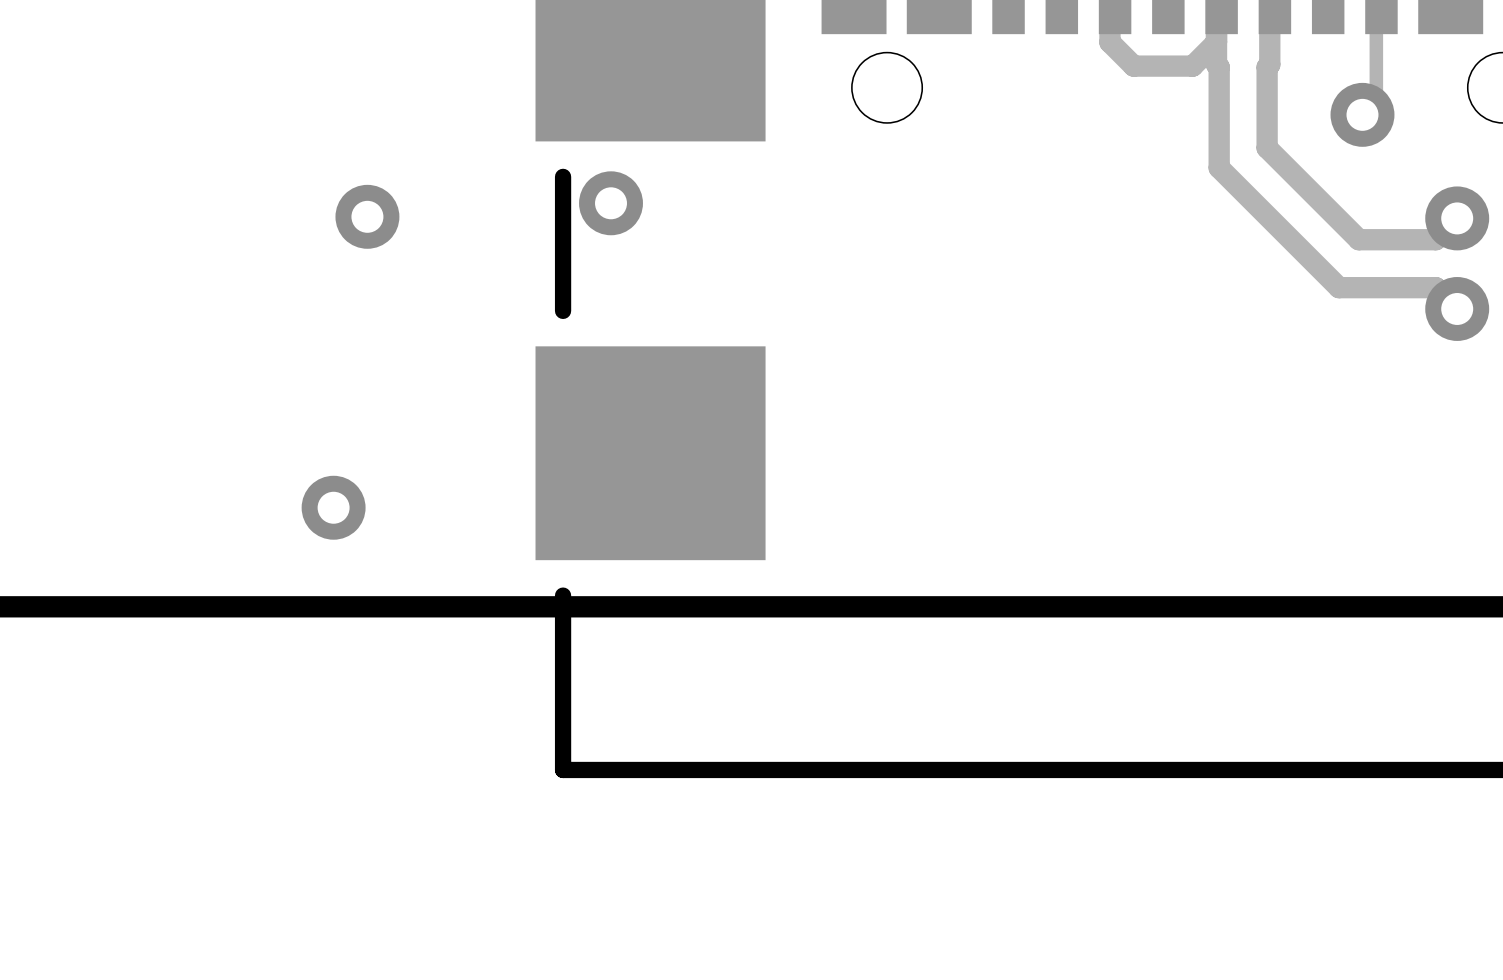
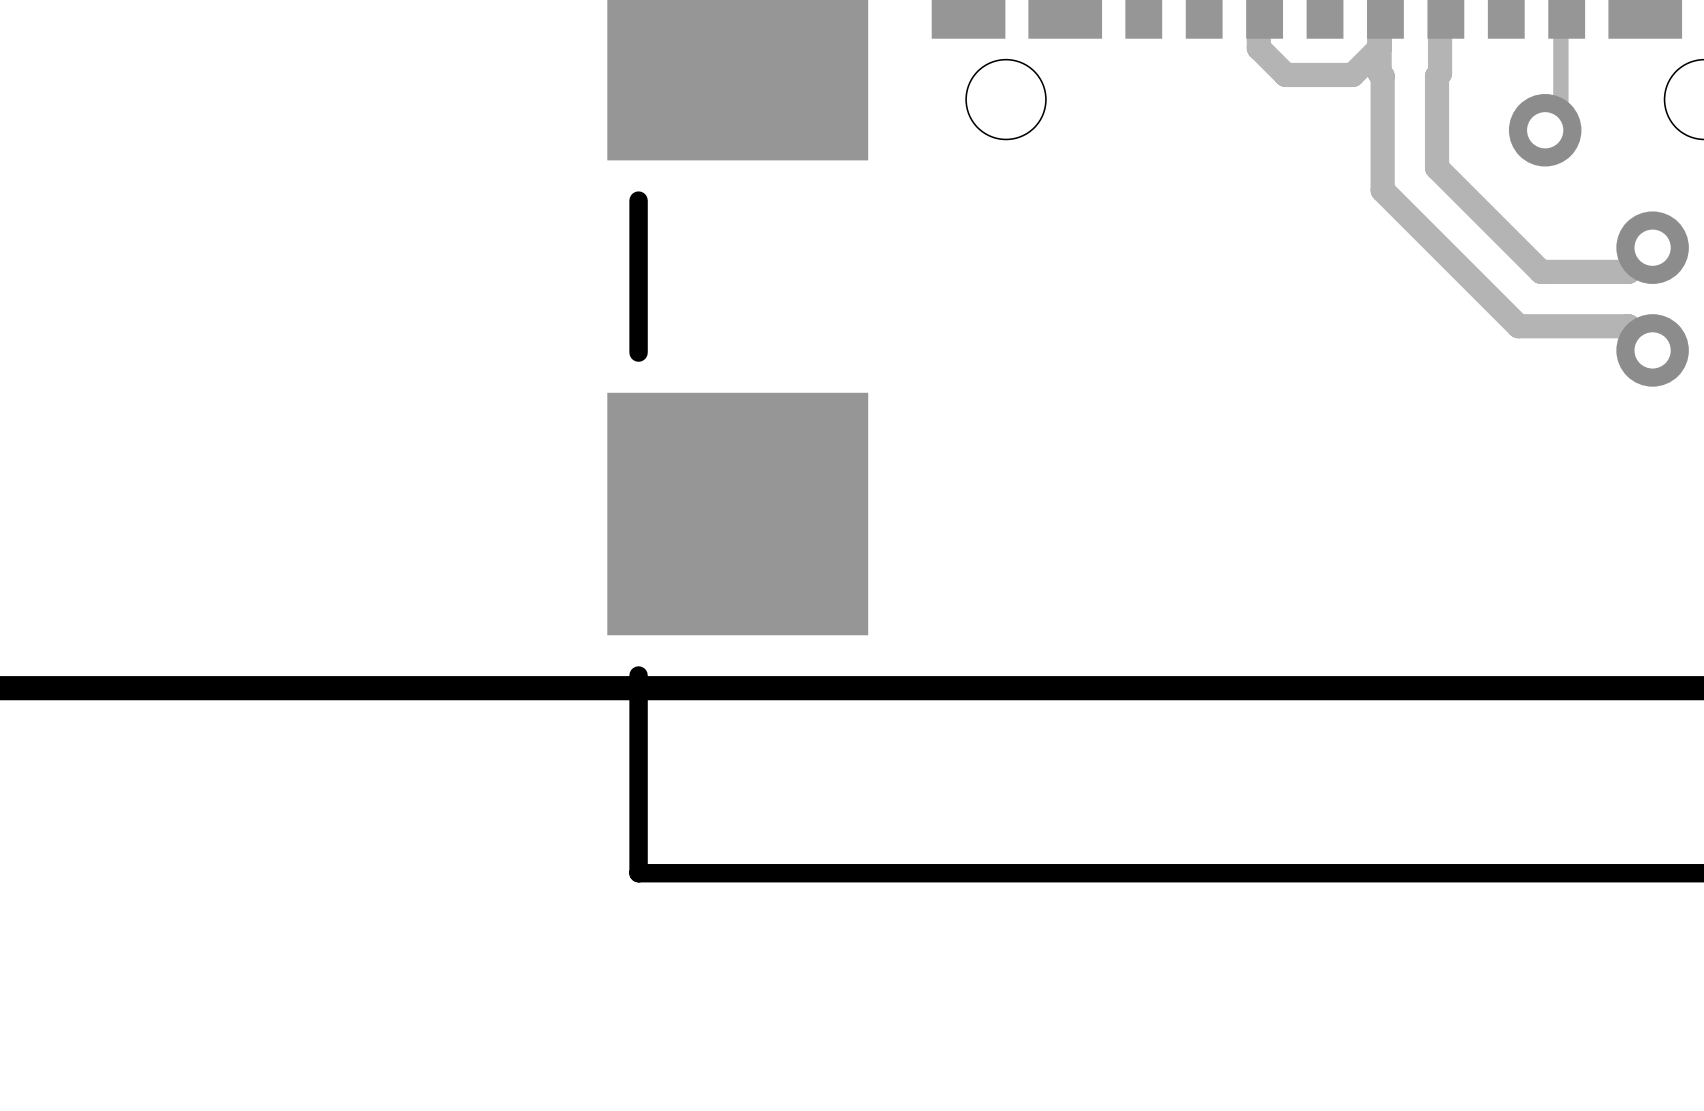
via: (611, 203) -> none
via: (367, 216) -> none
via: (333, 507) -> none

